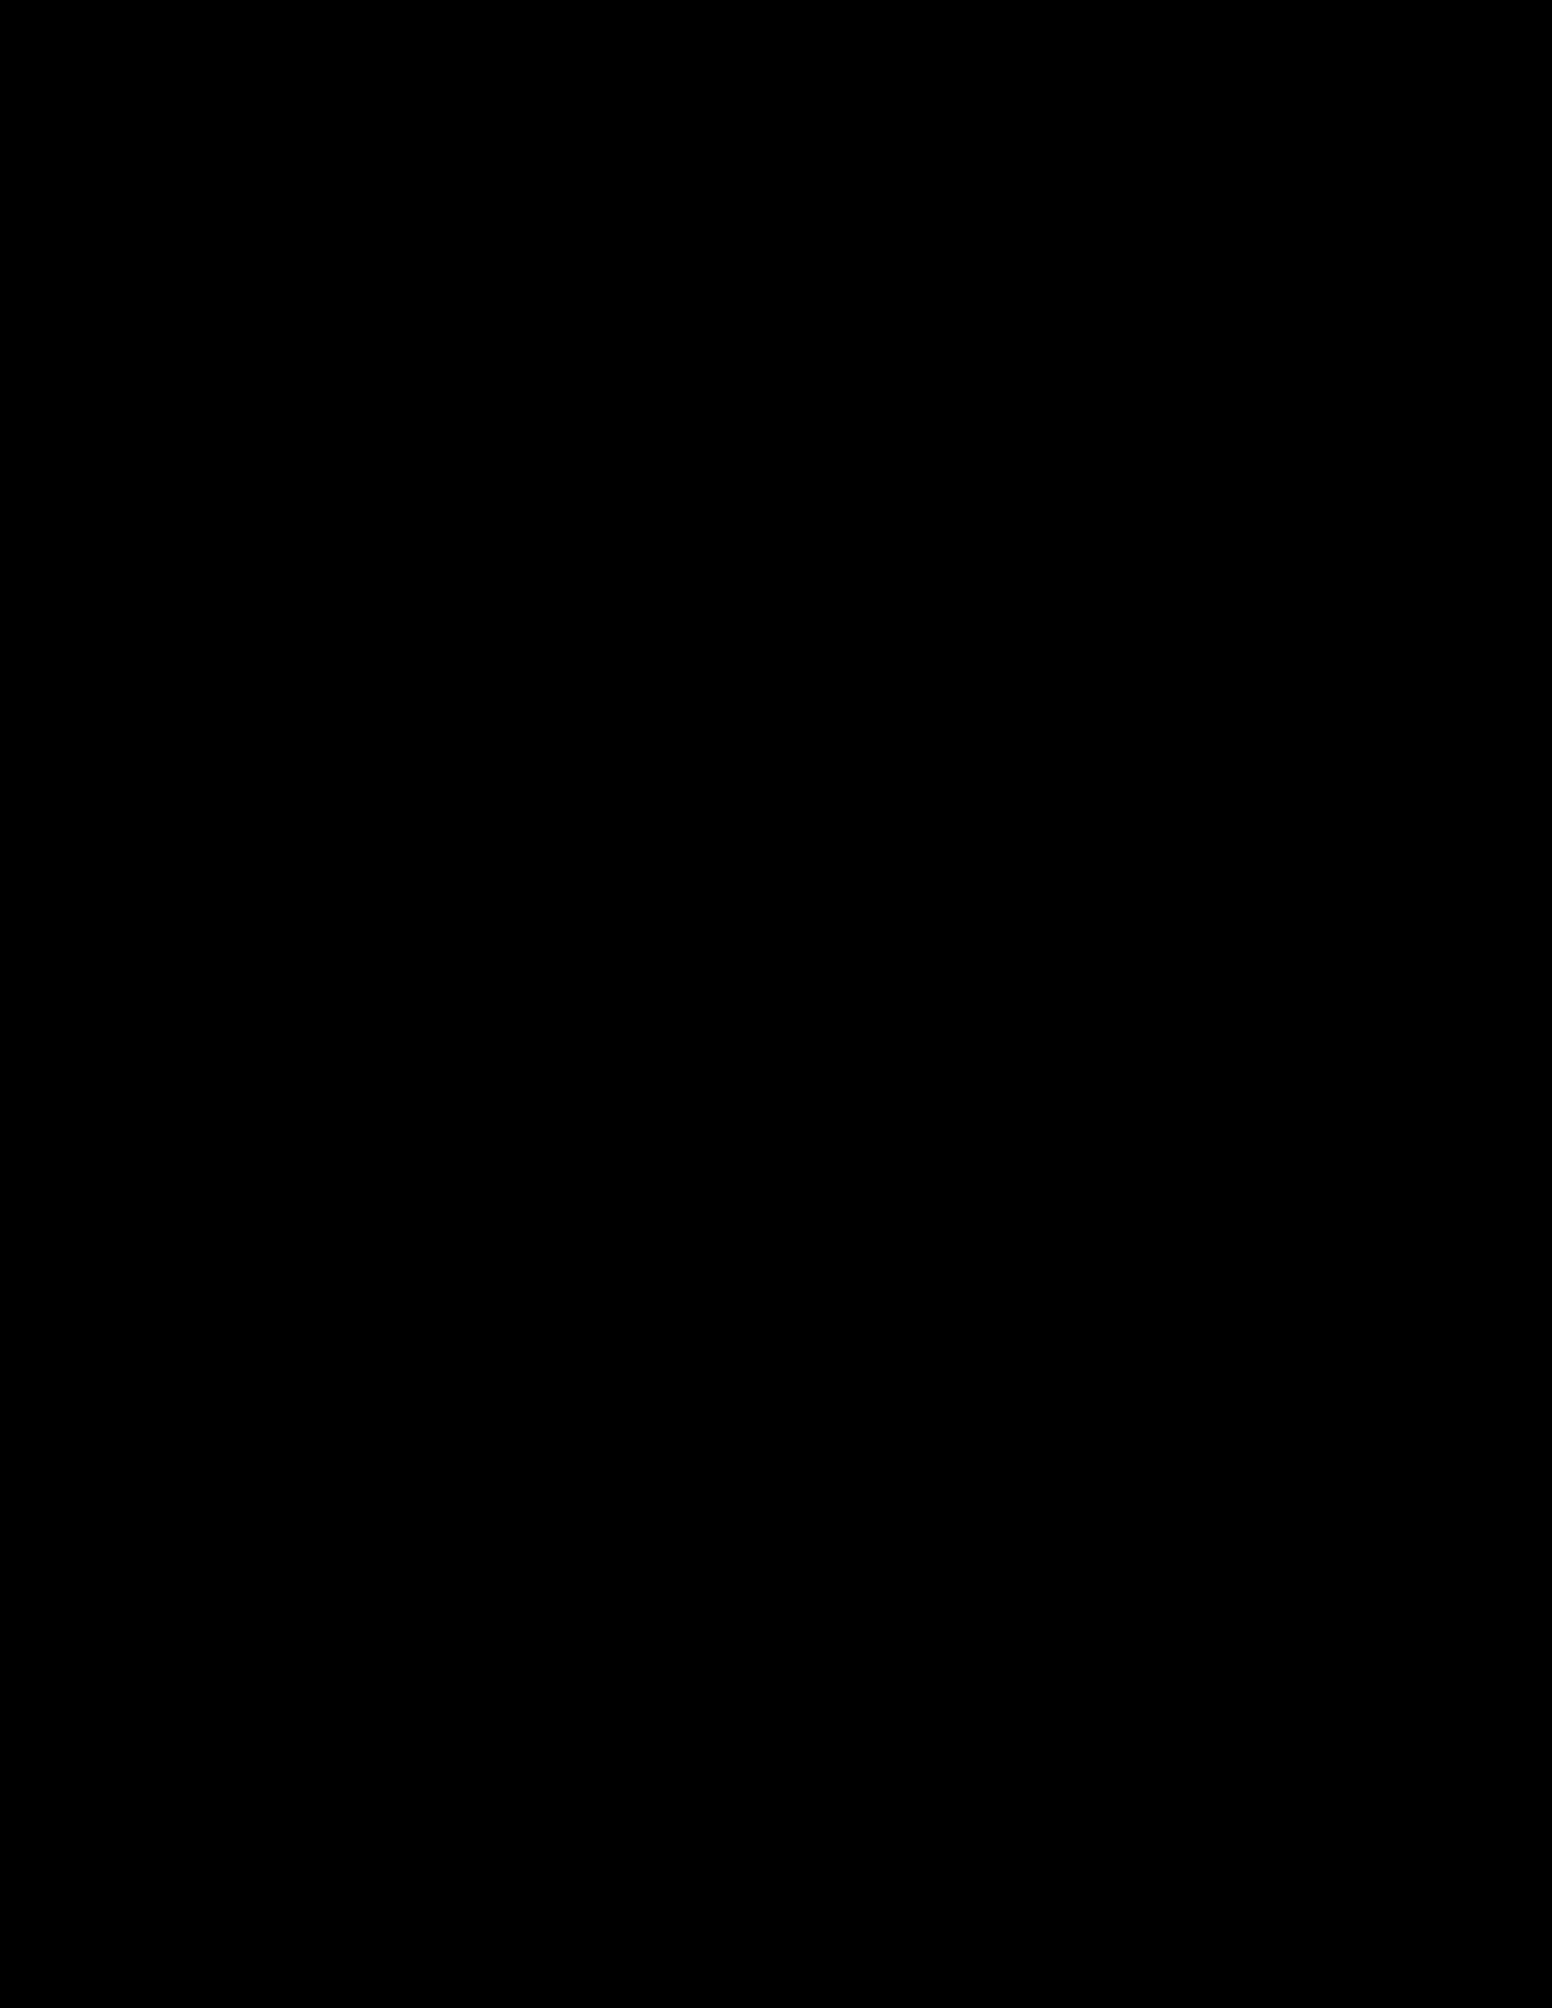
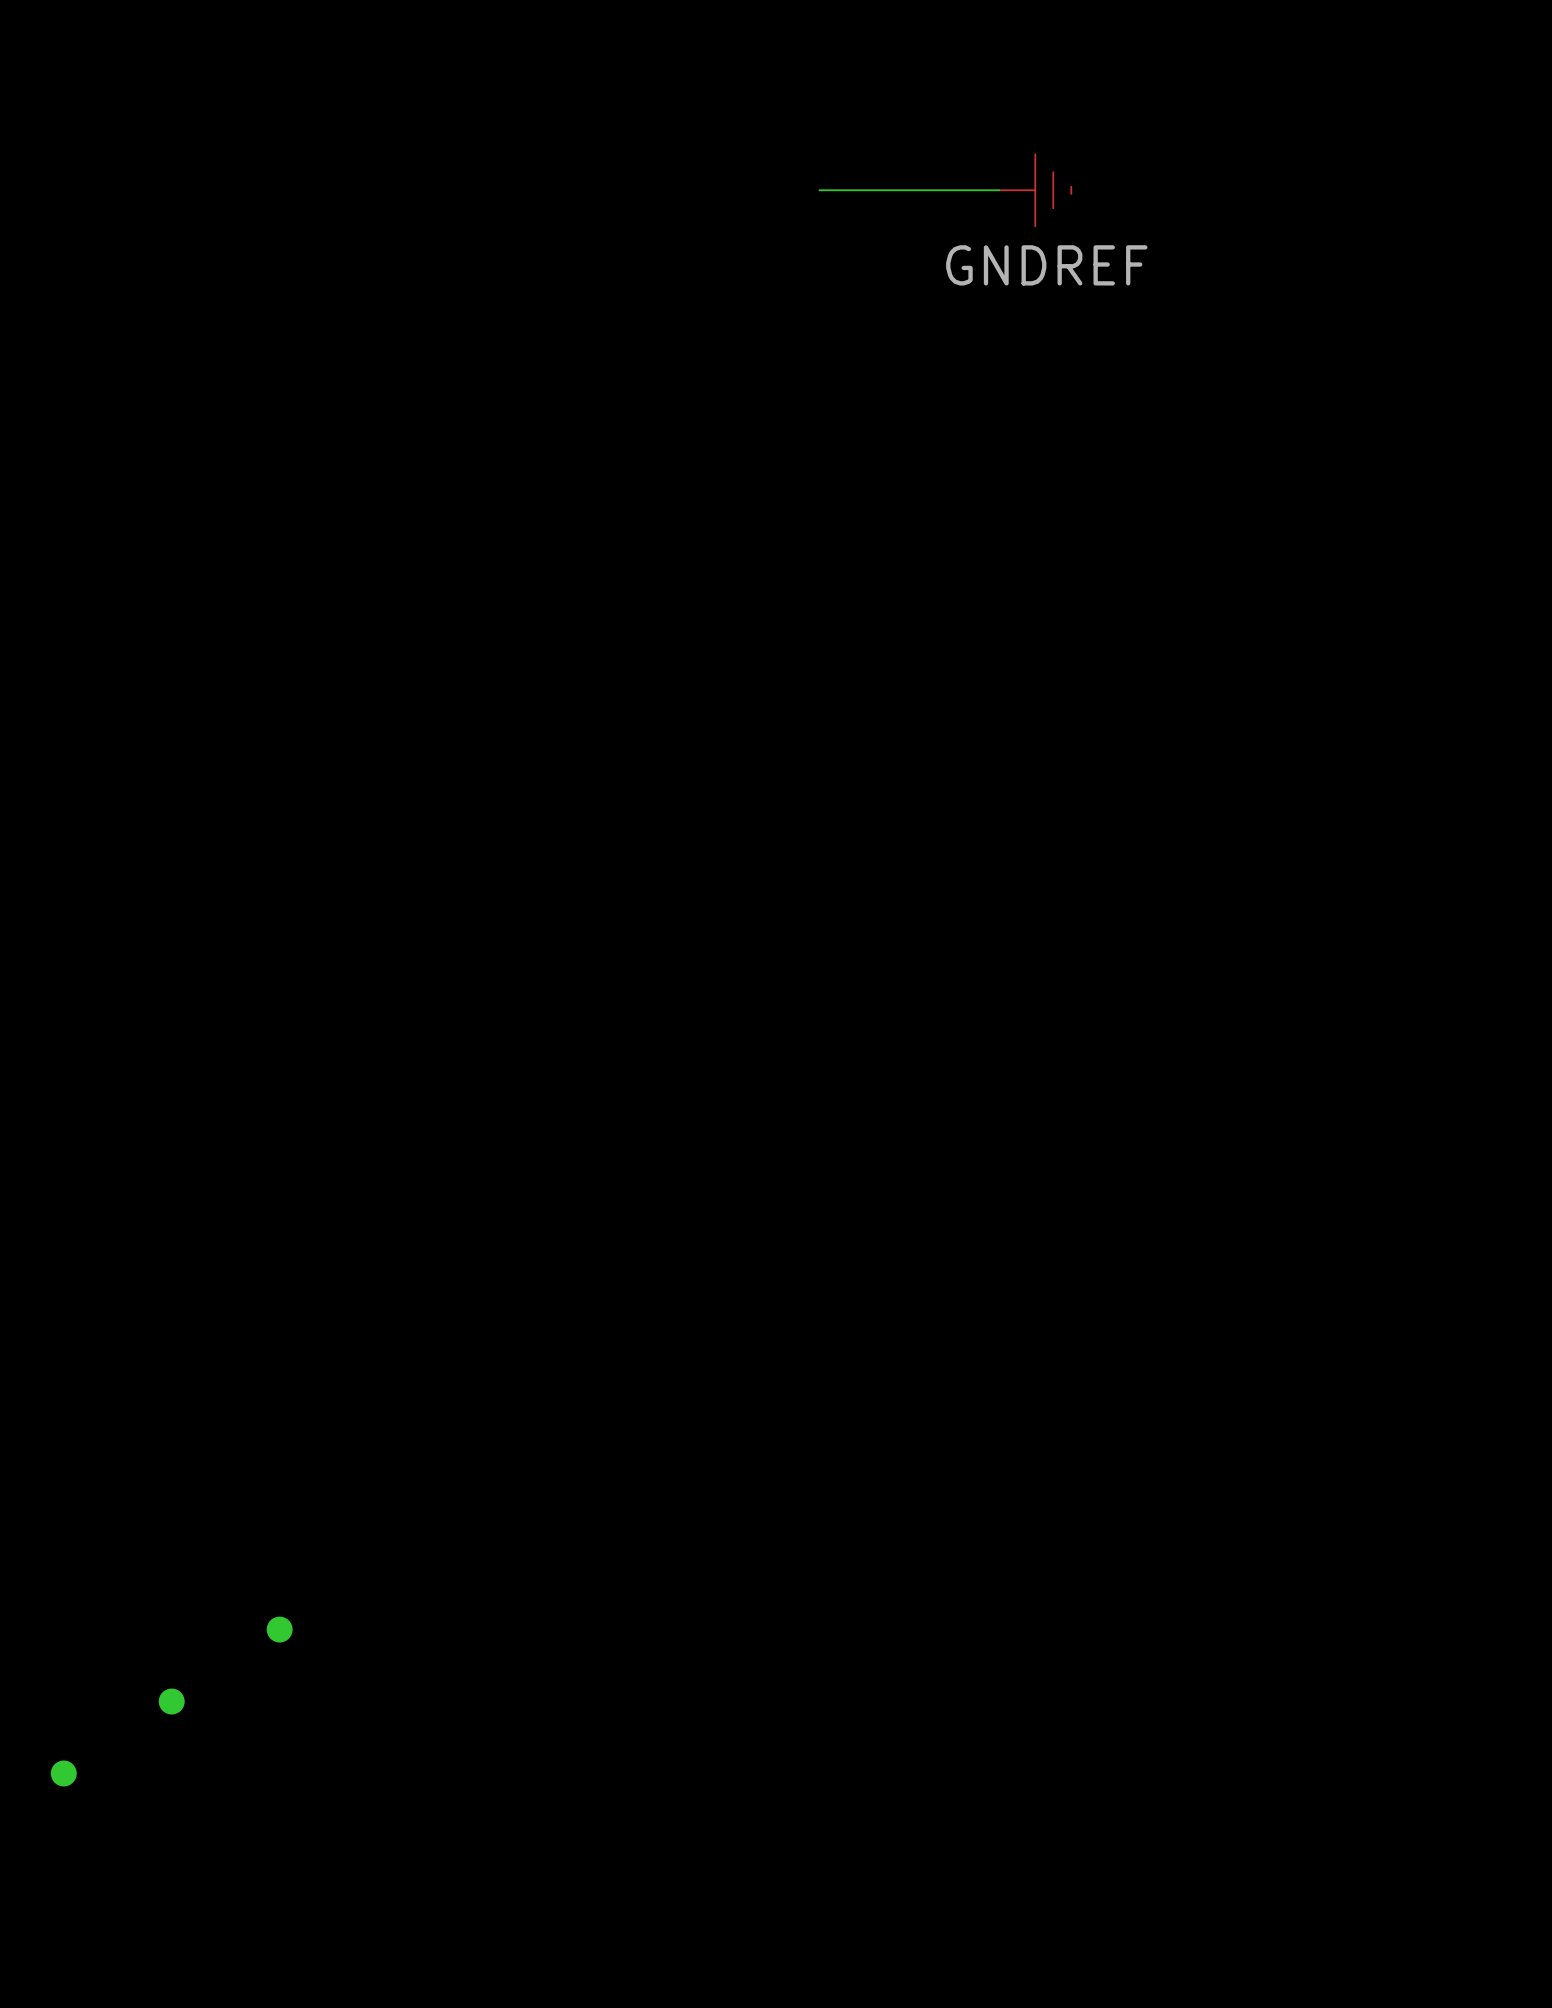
wire: none -> (819, 190) (999, 190)
power symbol: none -> GNDREF (1035, 190)
junction: none -> (279, 1629)
junction: none -> (171, 1701)
junction: none -> (63, 1773)

